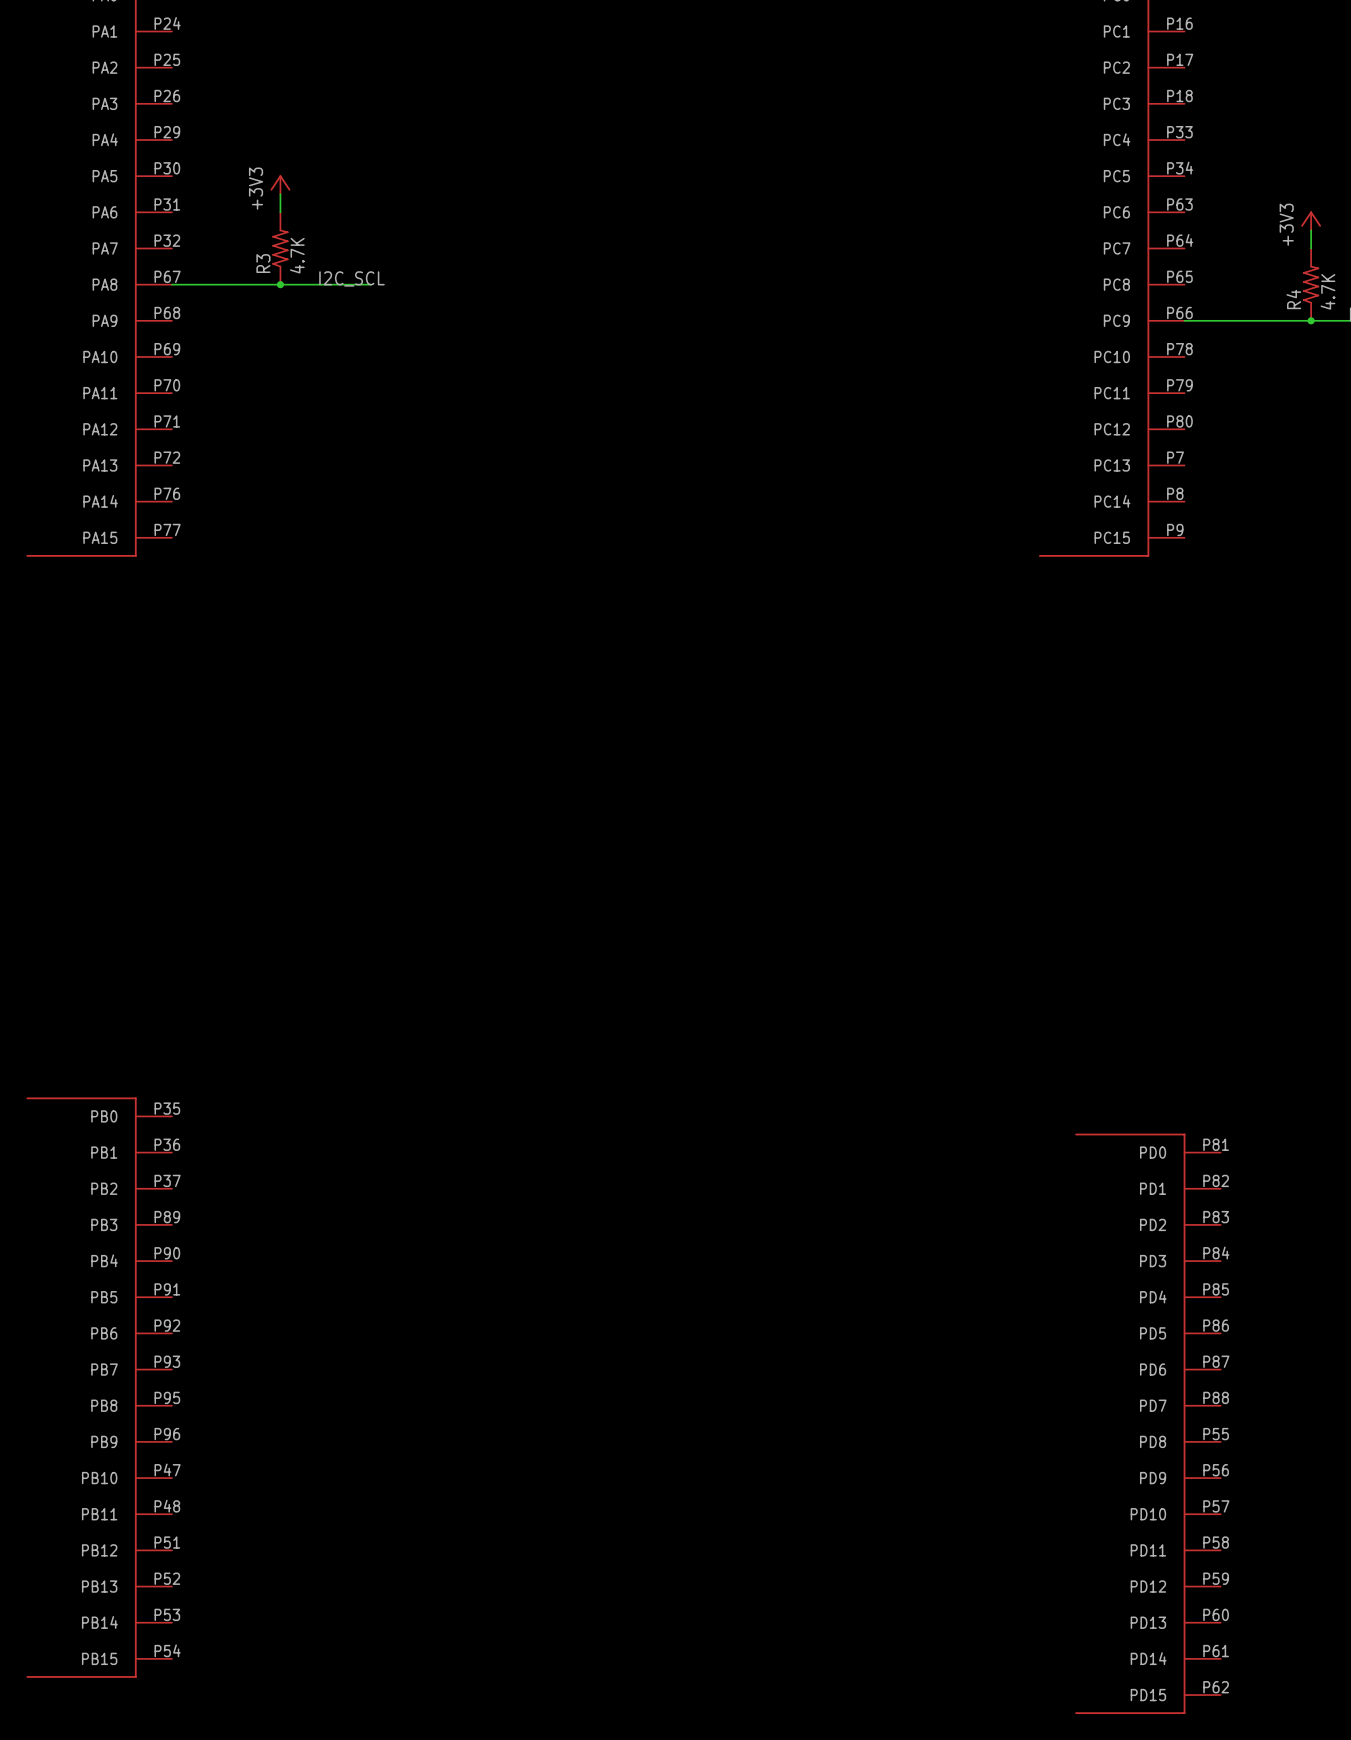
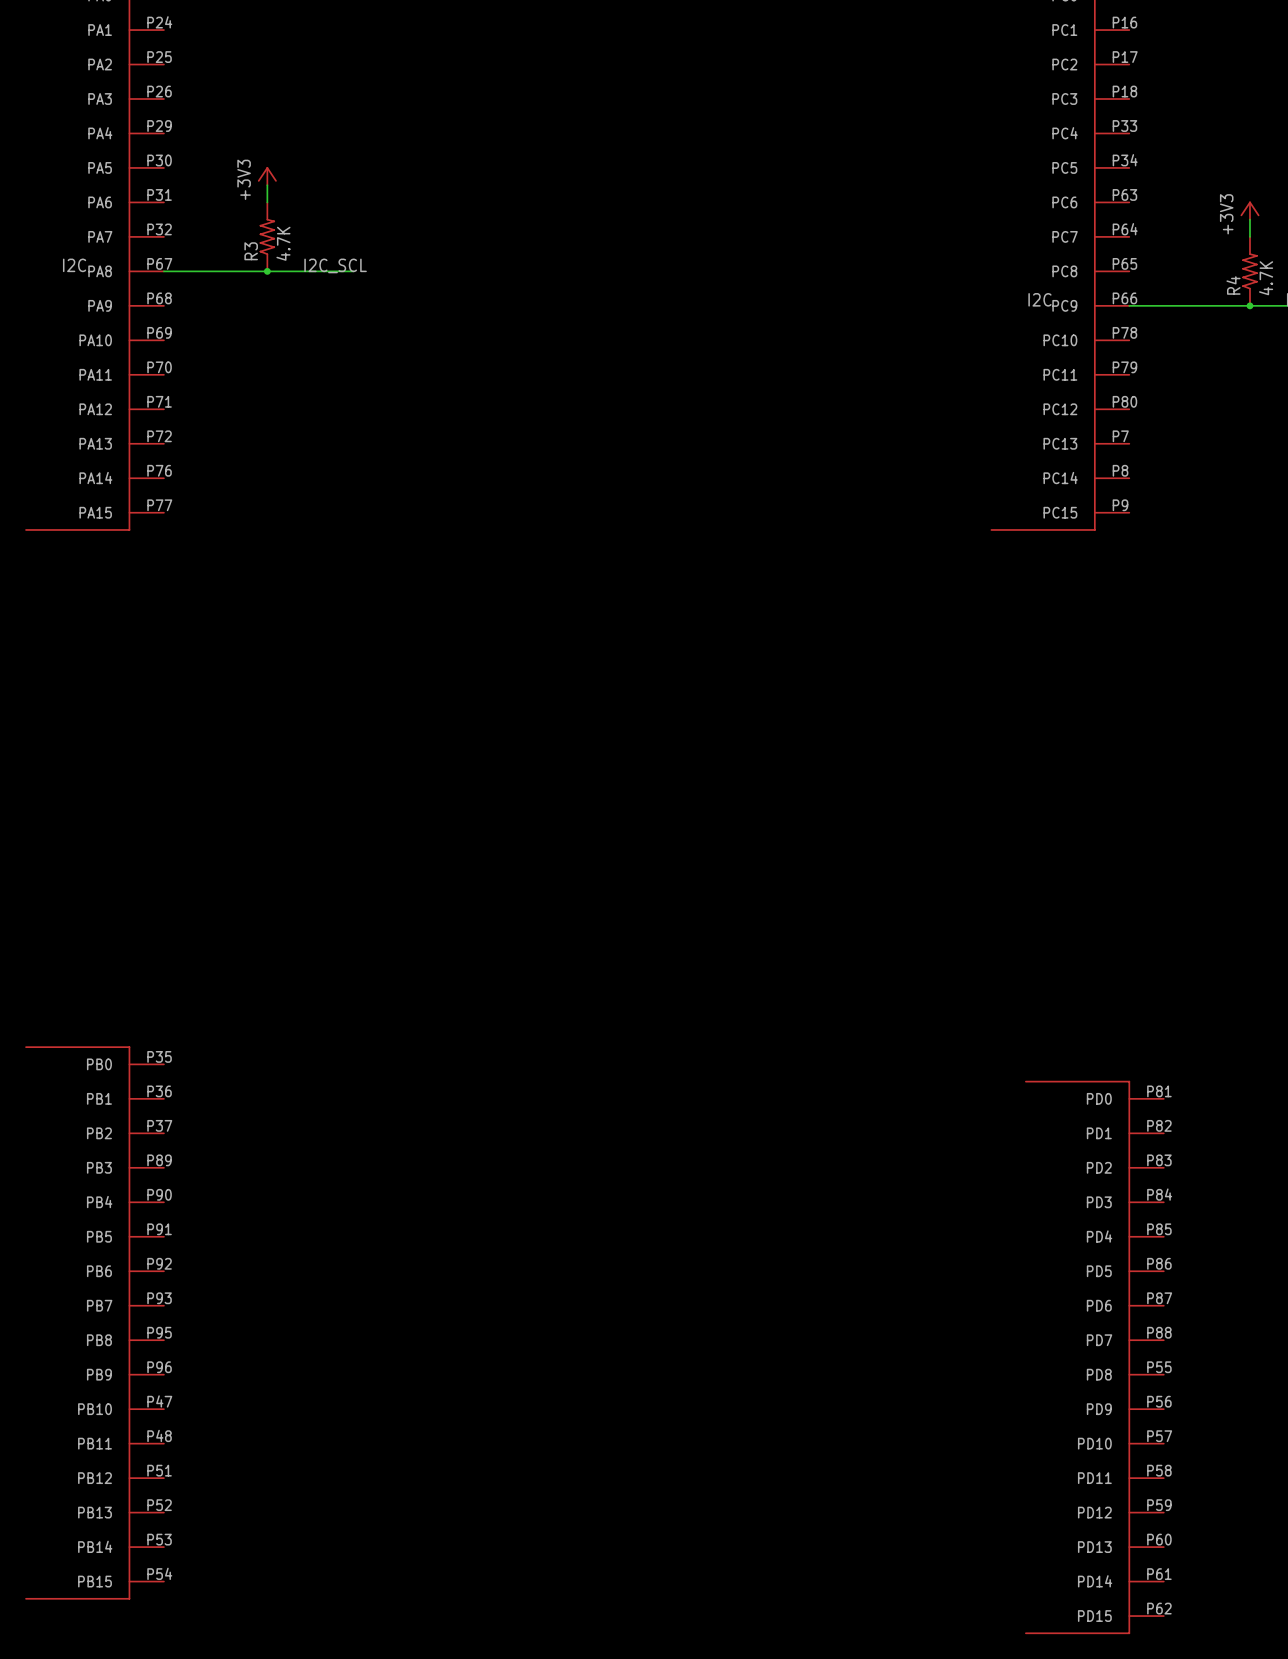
text: none -> I2C (74, 265)
text: none -> I2C (1039, 299)

